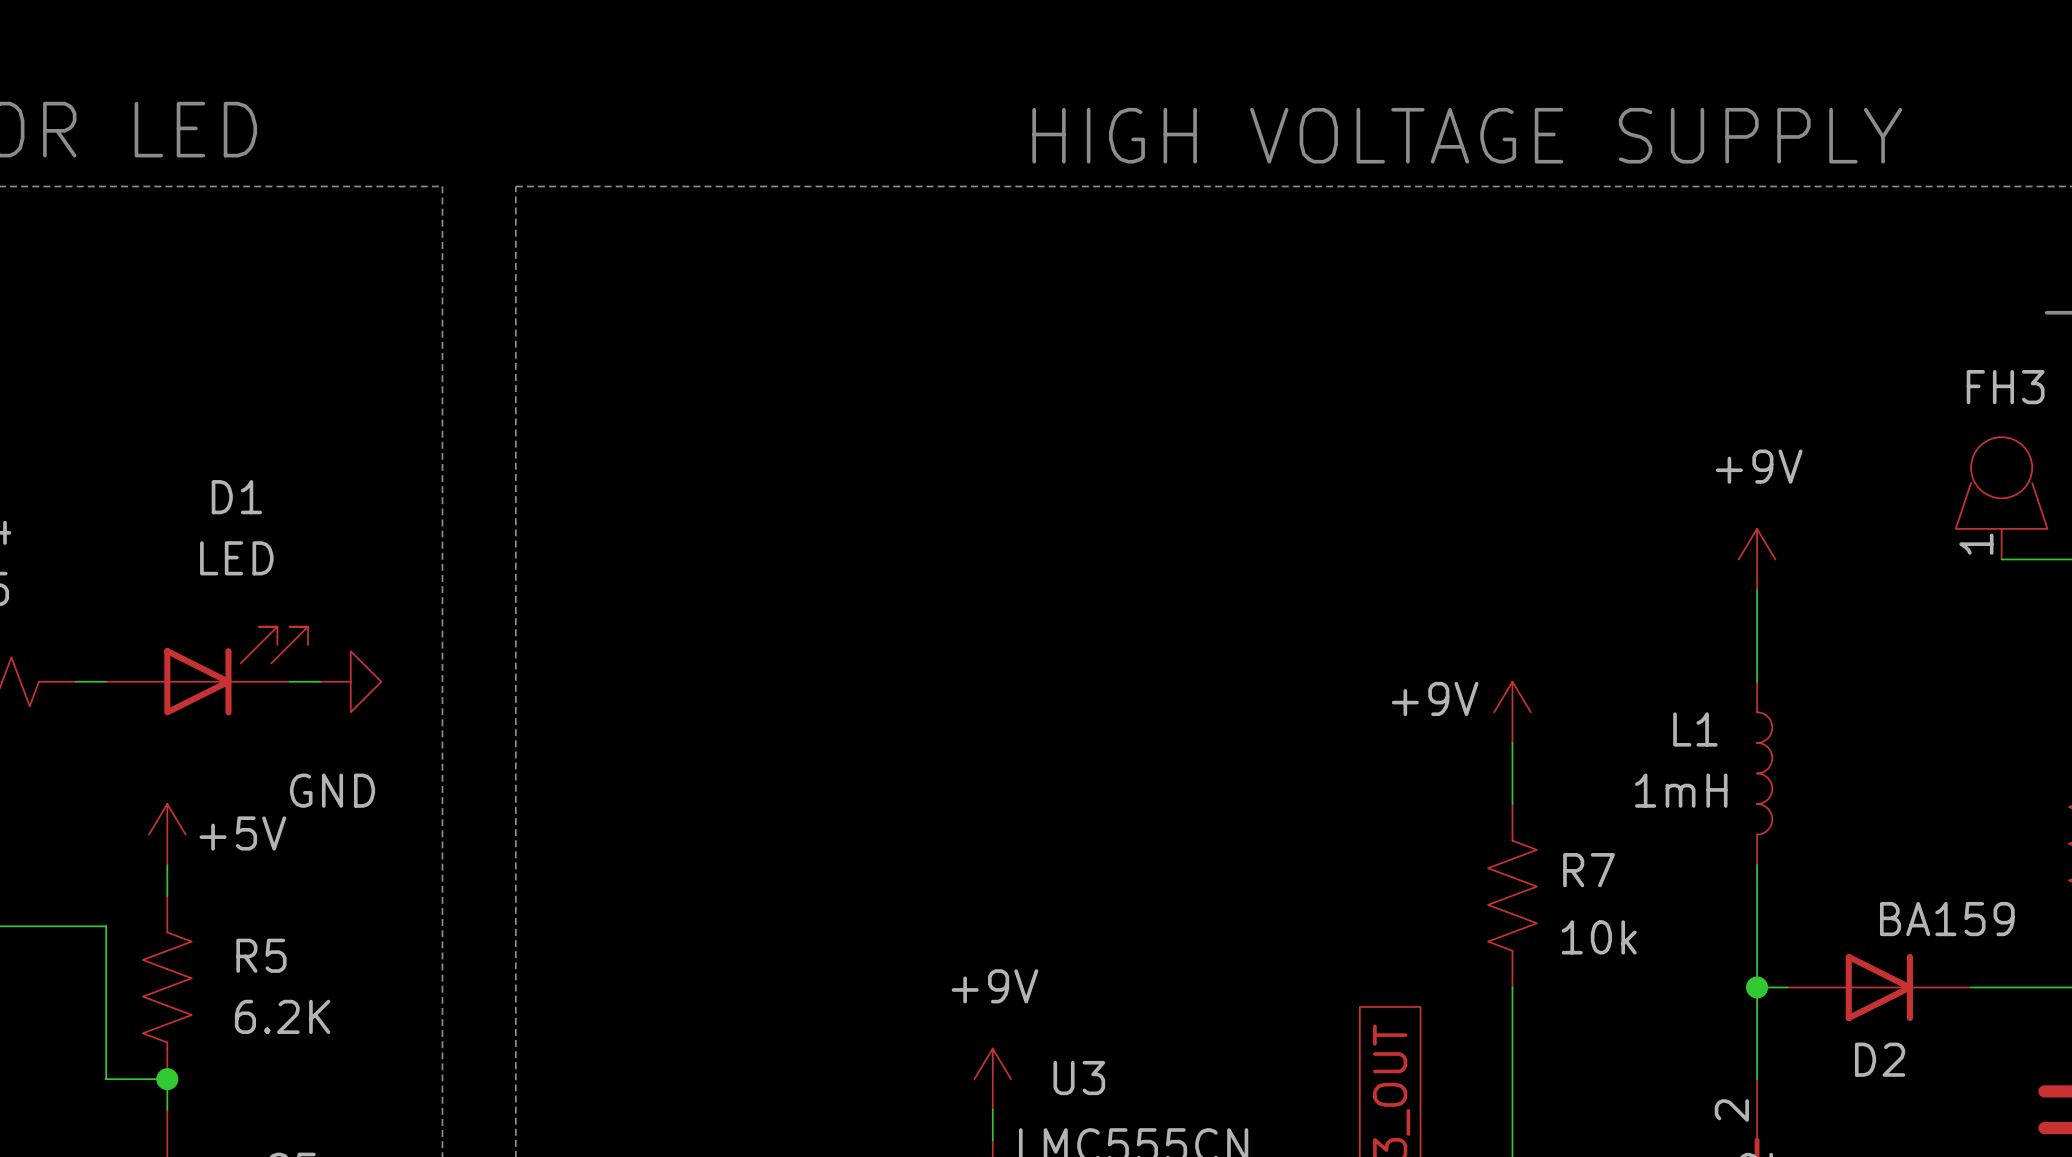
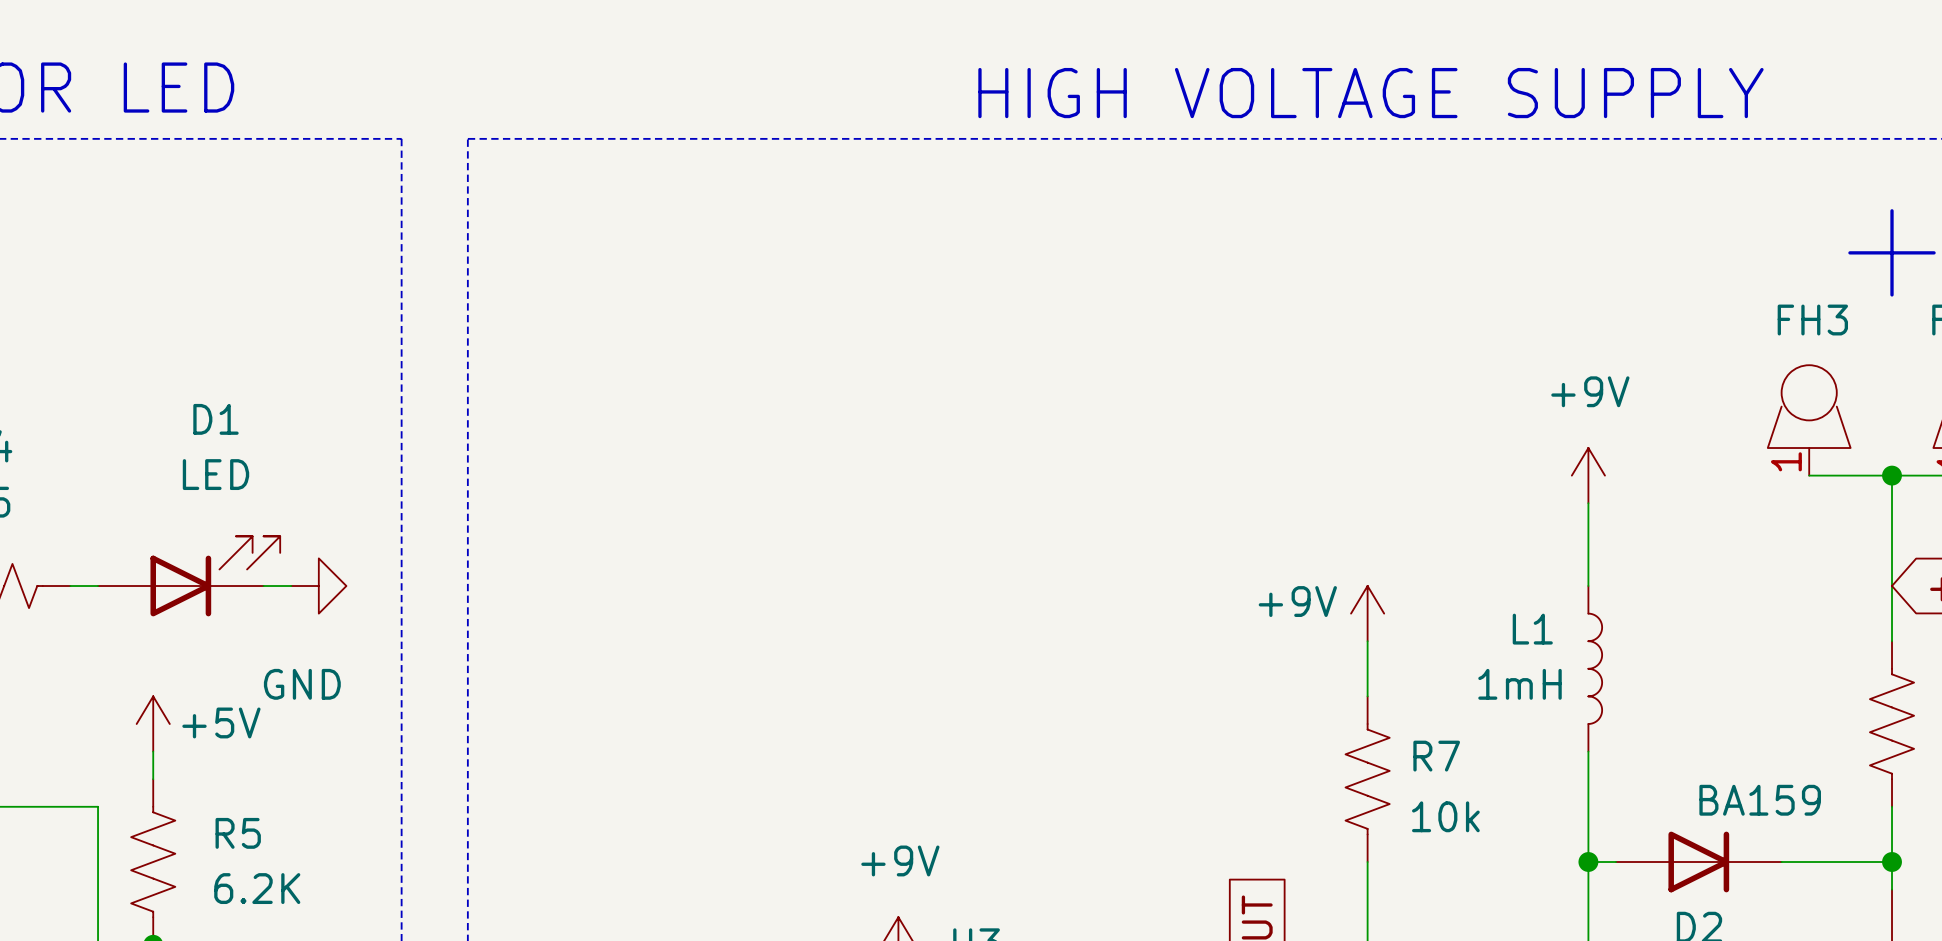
text position: HIGH VOLTAGE SUPPLY (1467, 135) -> HIGH VOLTAGE SUPPLY (1370, 93)

